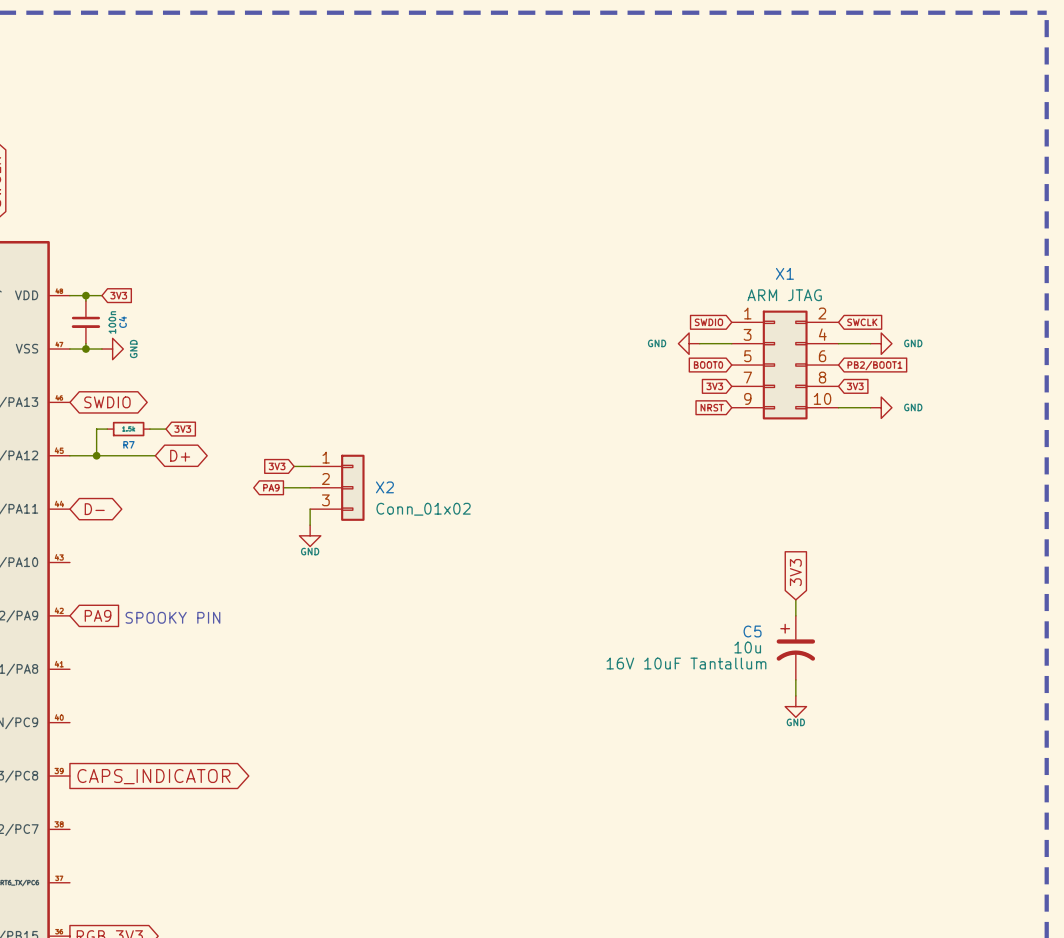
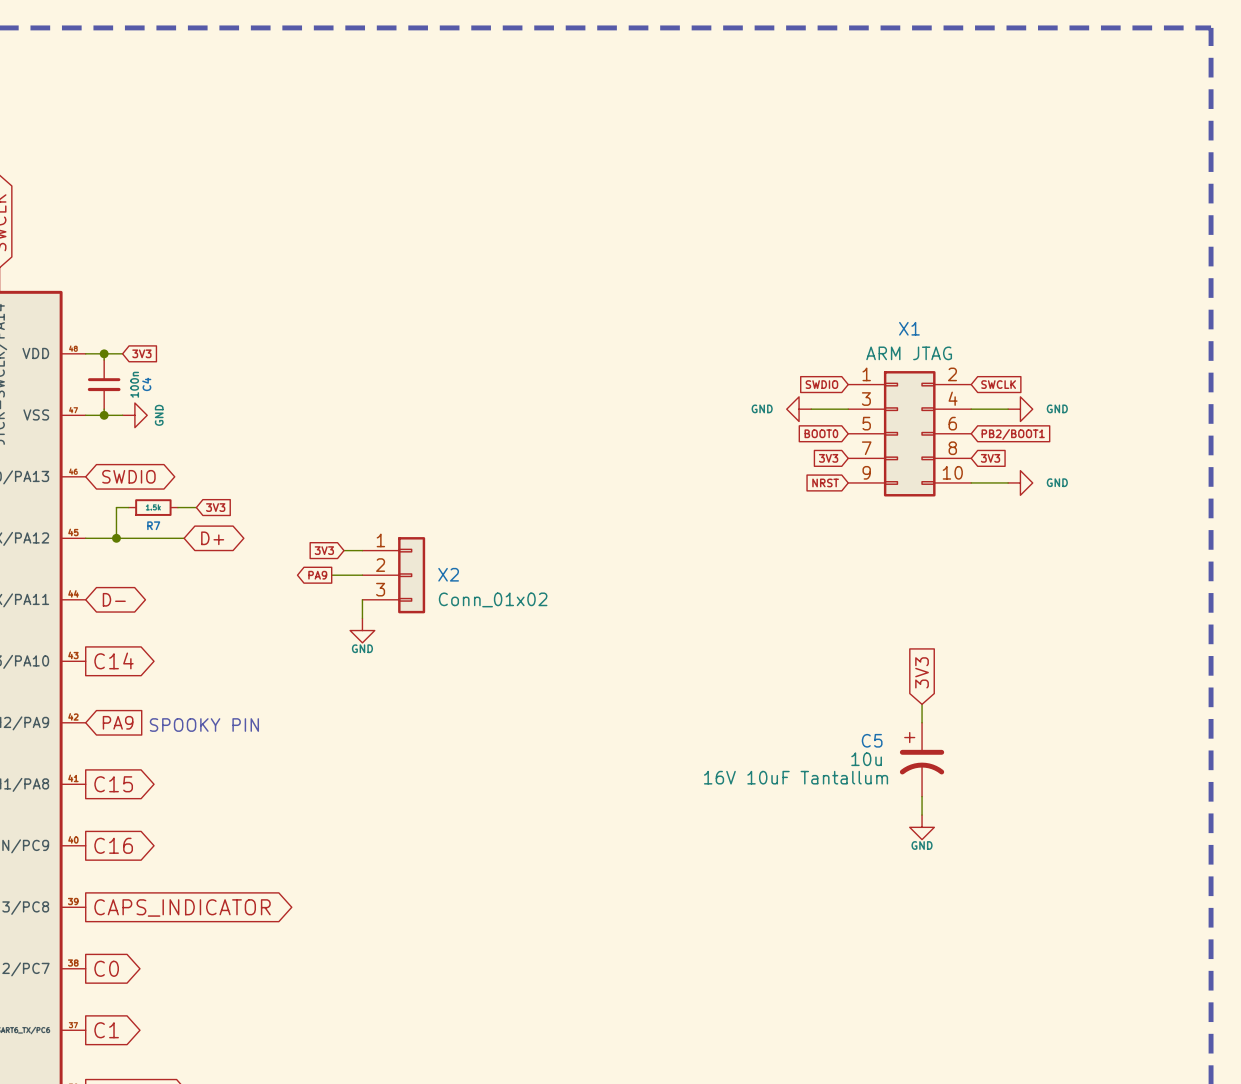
global label: none -> C14 (114, 660)
global label: none -> C15 (113, 784)
global label: none -> C16 (113, 845)
global label: none -> C0 (106, 968)
global label: none -> C1 (106, 1030)

